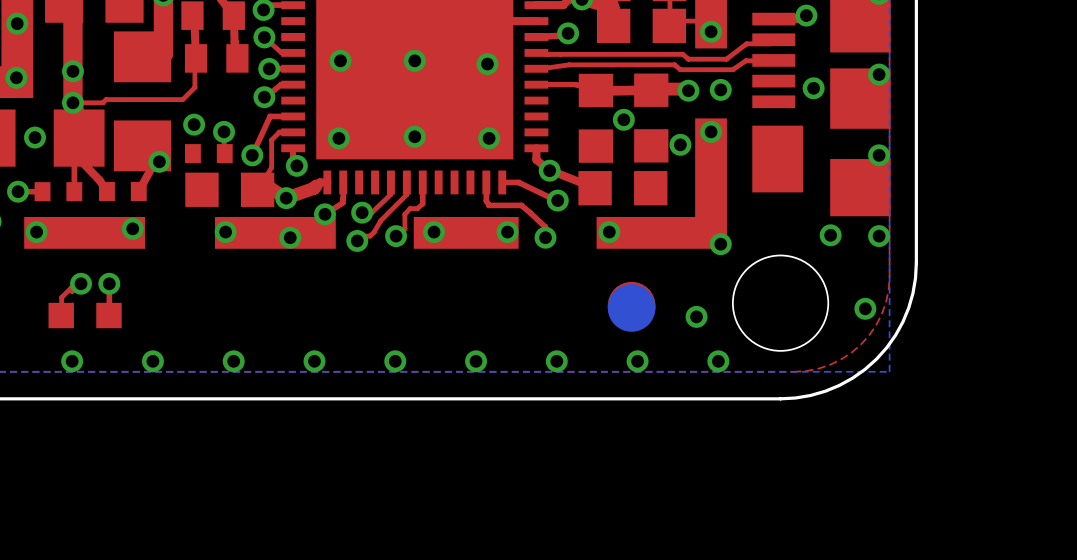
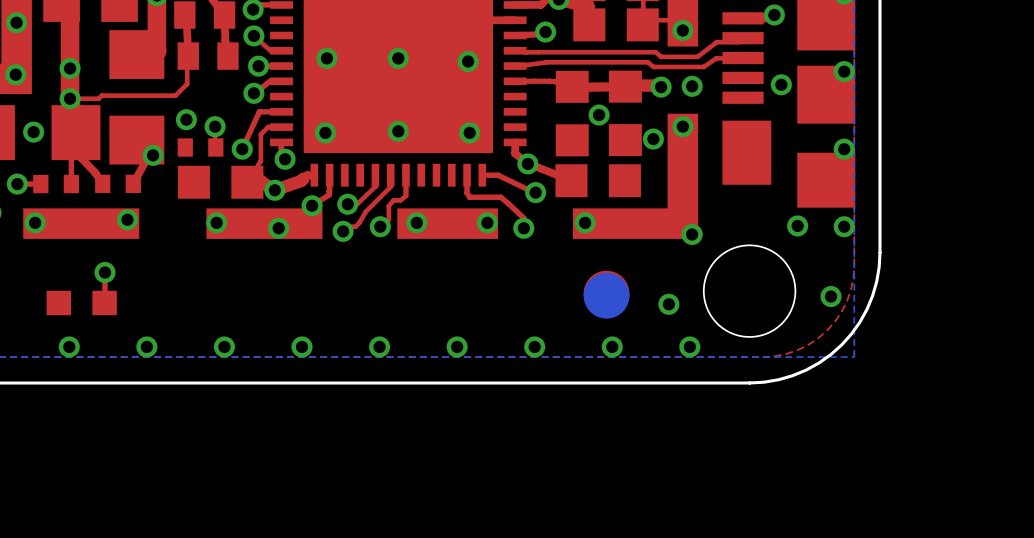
via: (81, 283) -> none
top track: (72, 291) (81, 283) (71, 287) (61, 297) (61, 315) -> none

